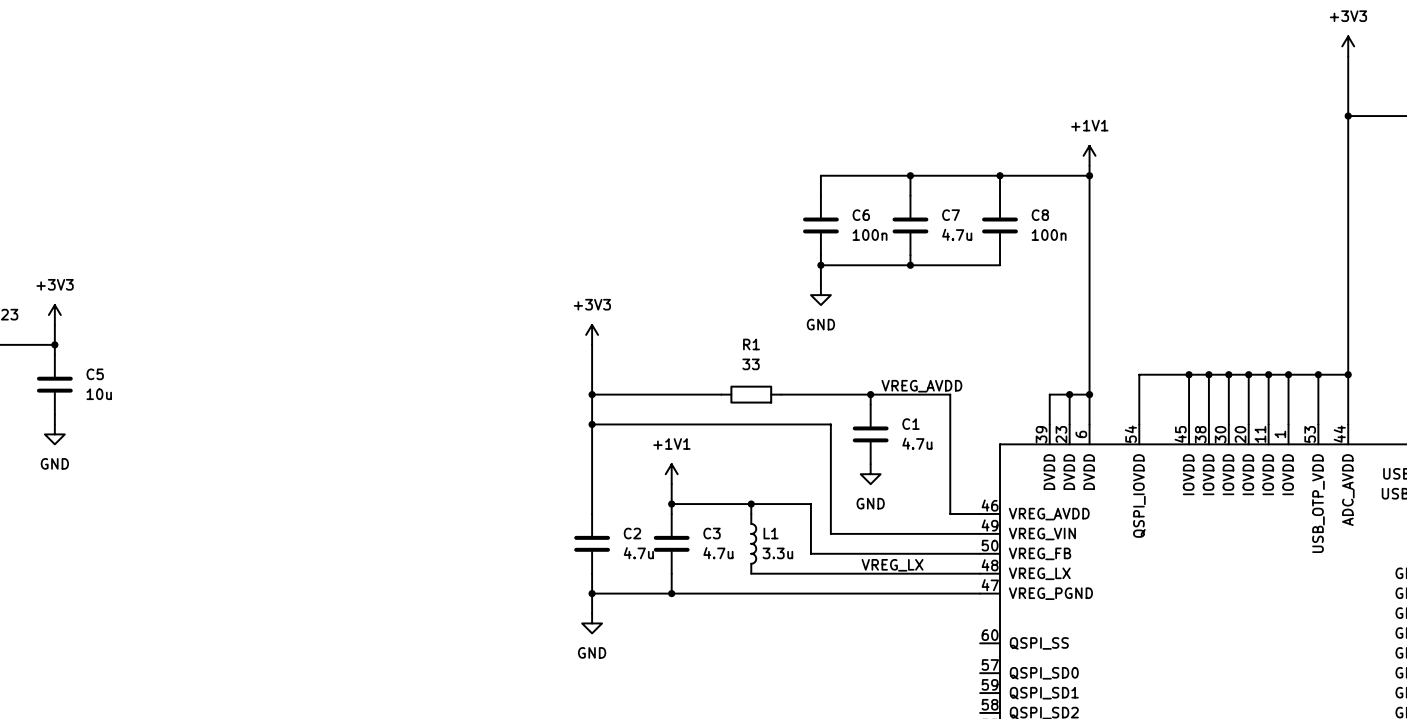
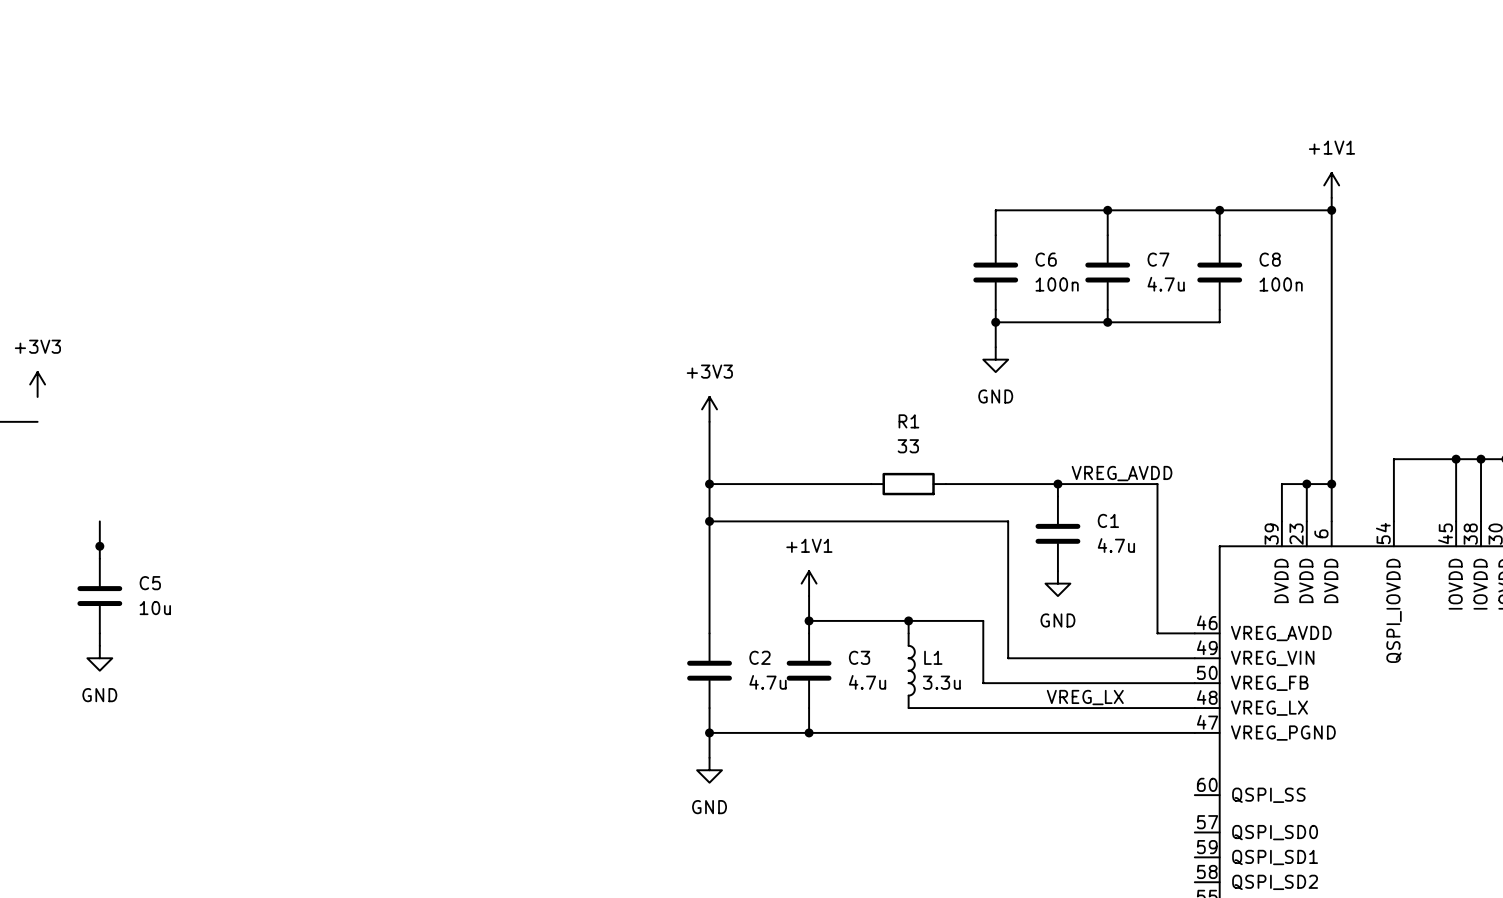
wire: (54, 324) (54, 354) -> (99, 521) (99, 558)
junction: (54, 344) -> none
C5 position: (54, 384) -> (99, 596)
wire: (54, 414) (54, 424) -> (99, 633) (99, 645)
power symbol: GND (54, 434) -> none
junction: none -> (99, 546)
power symbol: none -> GND (99, 658)

